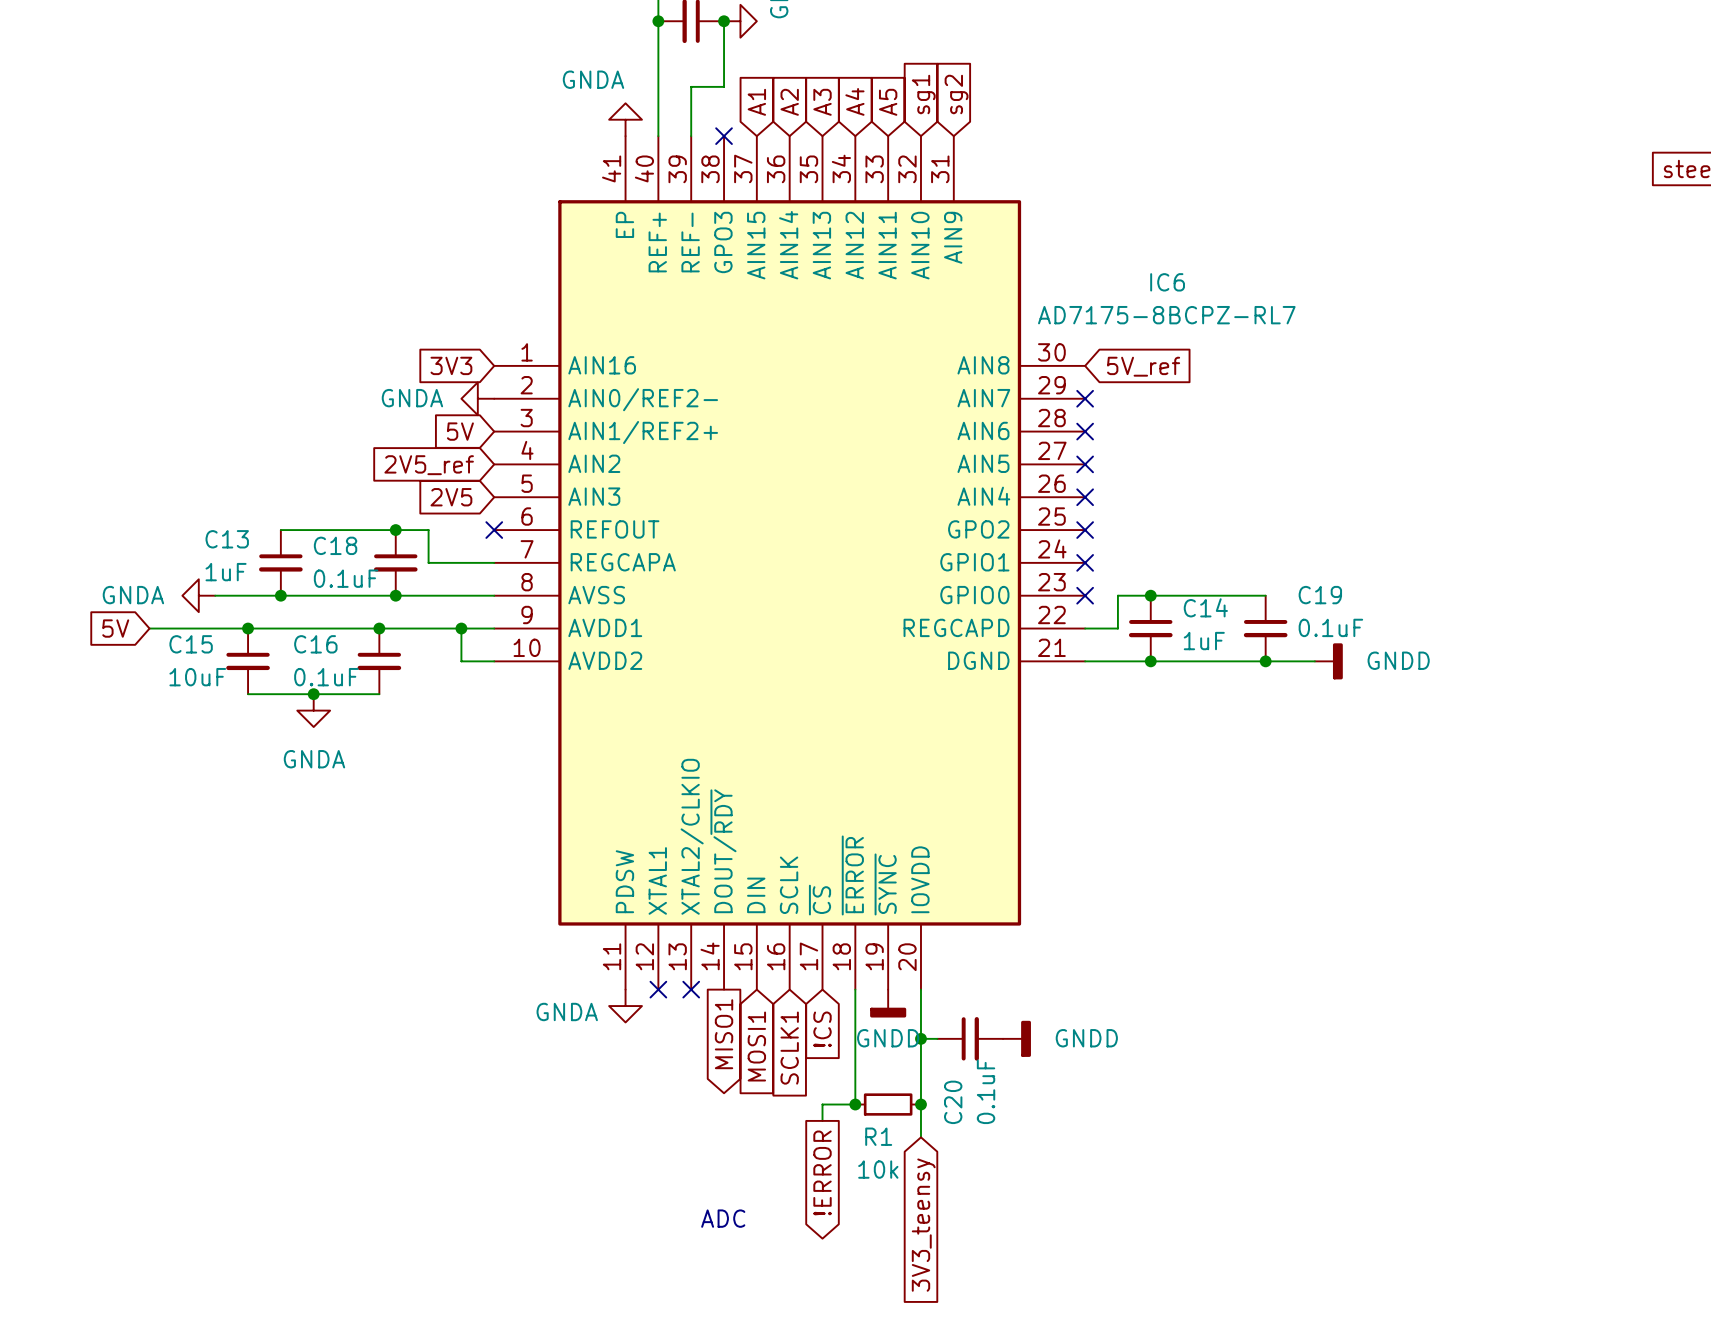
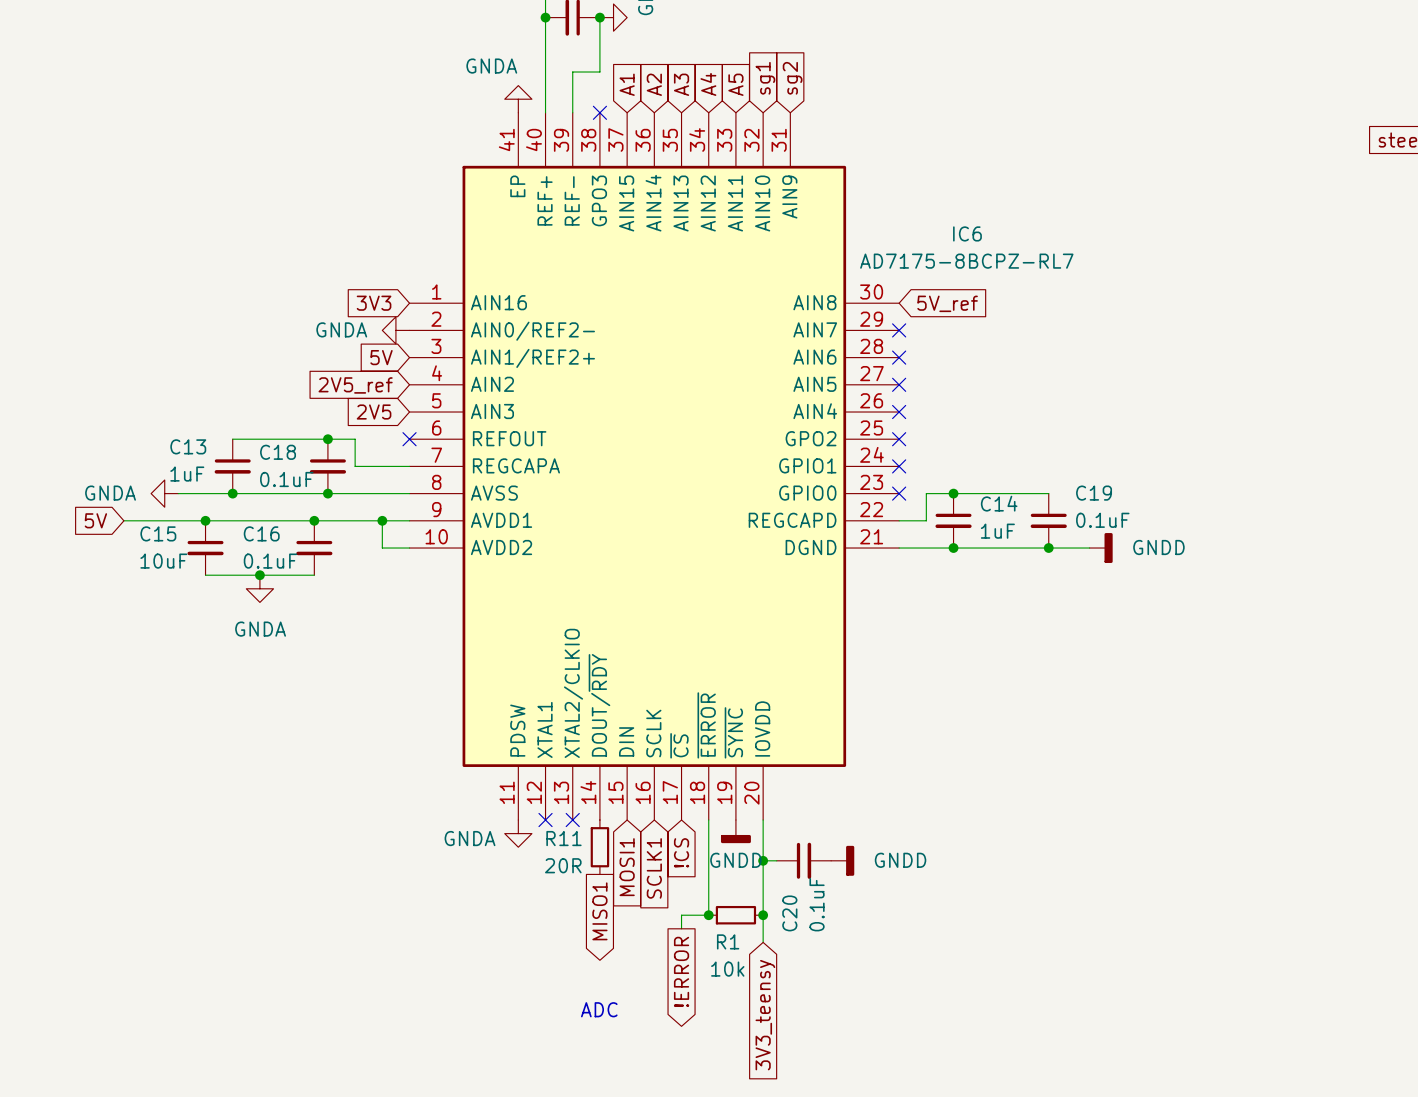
R11: none -> 20R (599, 847)
global label position: MISO1 (724, 1034) -> MISO1 (599, 911)

